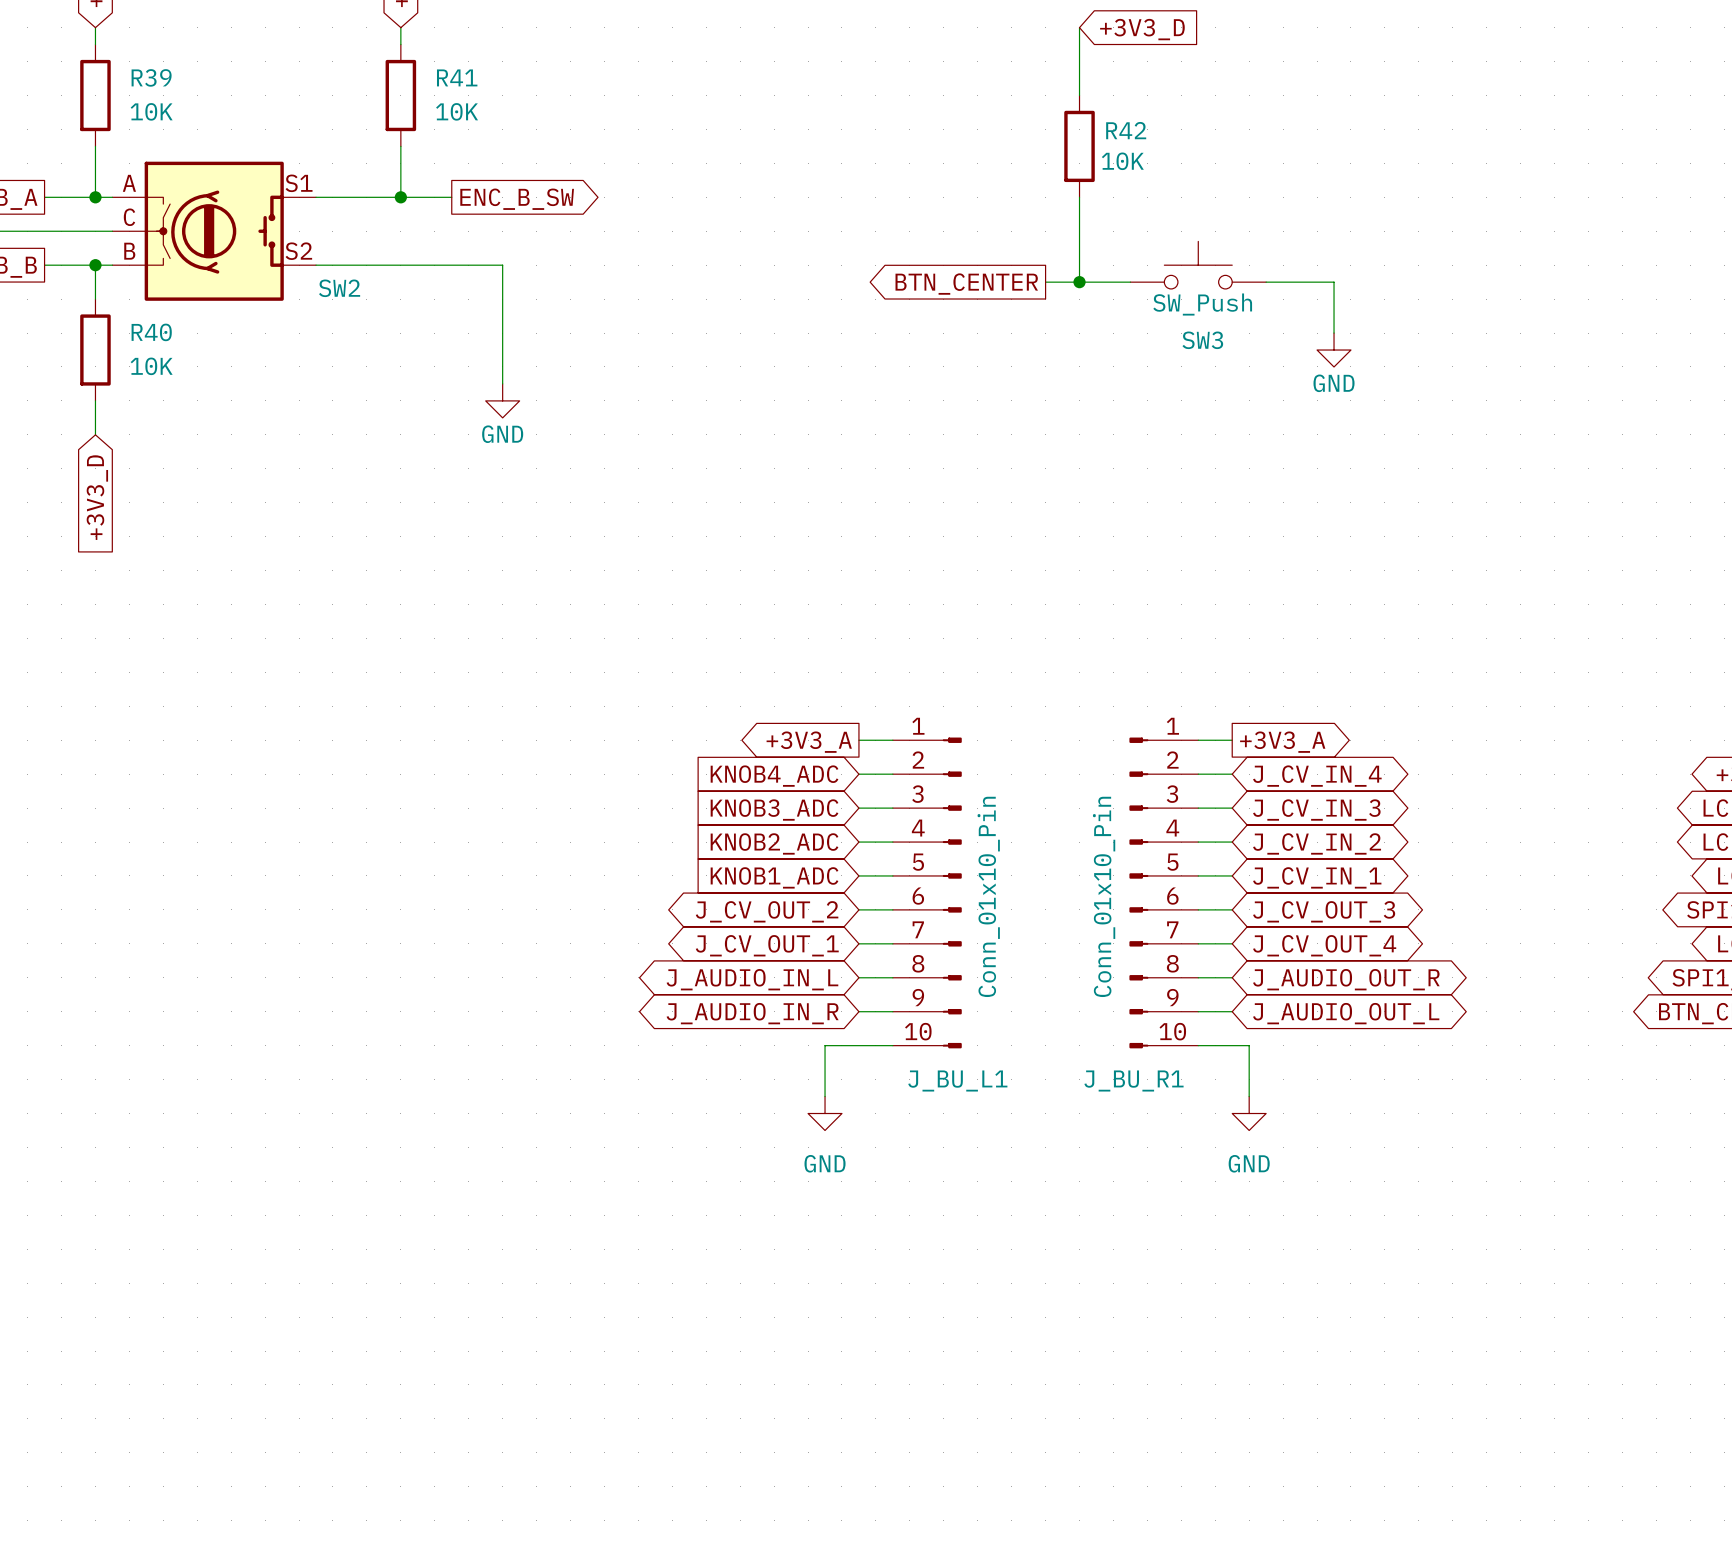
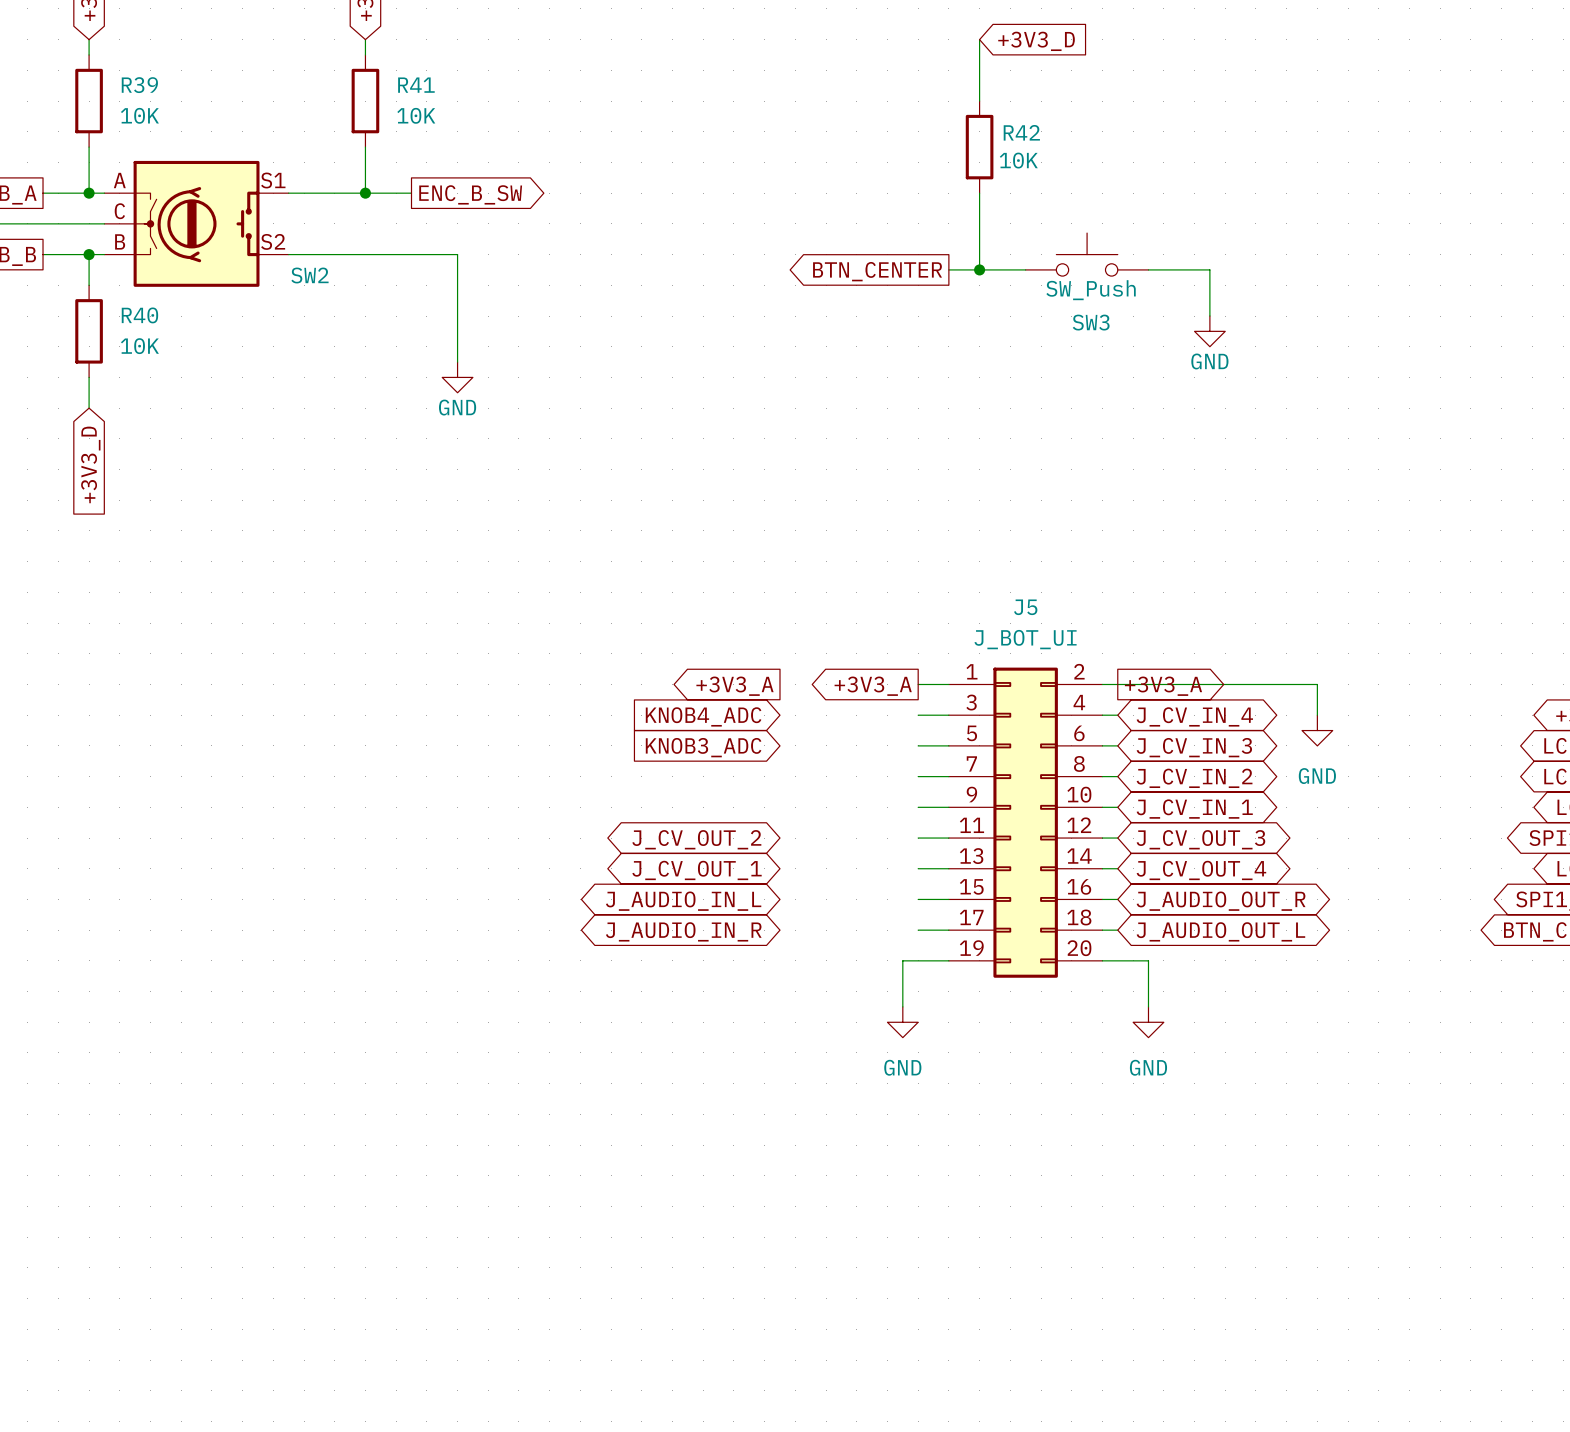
wire: (858, 740) (892, 740) -> (918, 684) (948, 684)
wire: none -> (1117, 684) (1317, 684) (1317, 715)
global label: none -> +3V3_A (873, 686)
wire: (858, 774) (892, 774) -> (918, 715) (948, 715)
power symbol: none -> GND (1317, 730)
wire: (858, 808) (892, 808) -> (918, 745) (948, 745)
wire: (858, 842) (892, 842) -> (918, 776) (948, 776)
global label: KNOB2_ADC (774, 843) -> none
wire: (858, 875) (892, 875) -> (918, 807) (948, 807)
global label: KNOB1_ADC (774, 877) -> none
J_BU_L1: Conn_01x10_Pin (927, 892) -> none
J5: none -> J_BOT_UI (1025, 822)
J_BU_R1: Conn_01x10_Pin (1163, 892) -> none
wire: (858, 909) (892, 909) -> (918, 838) (948, 838)
wire: (858, 943) (892, 943) -> (918, 868) (948, 868)
wire: (858, 977) (892, 977) -> (918, 899) (948, 899)
wire: (858, 1011) (892, 1011) -> (918, 930) (948, 930)
wire: (892, 1045) (825, 1045) (825, 1096) -> none
wire: none -> (948, 960) (902, 960) (902, 1006)
wire: (1249, 1045) (1249, 1096) -> (1133, 960) (1148, 960) (1148, 1006)
power symbol: GND (825, 1113) -> none
power symbol: none -> GND (902, 1022)
power symbol position: GND (1249, 1113) -> GND (1148, 1022)

